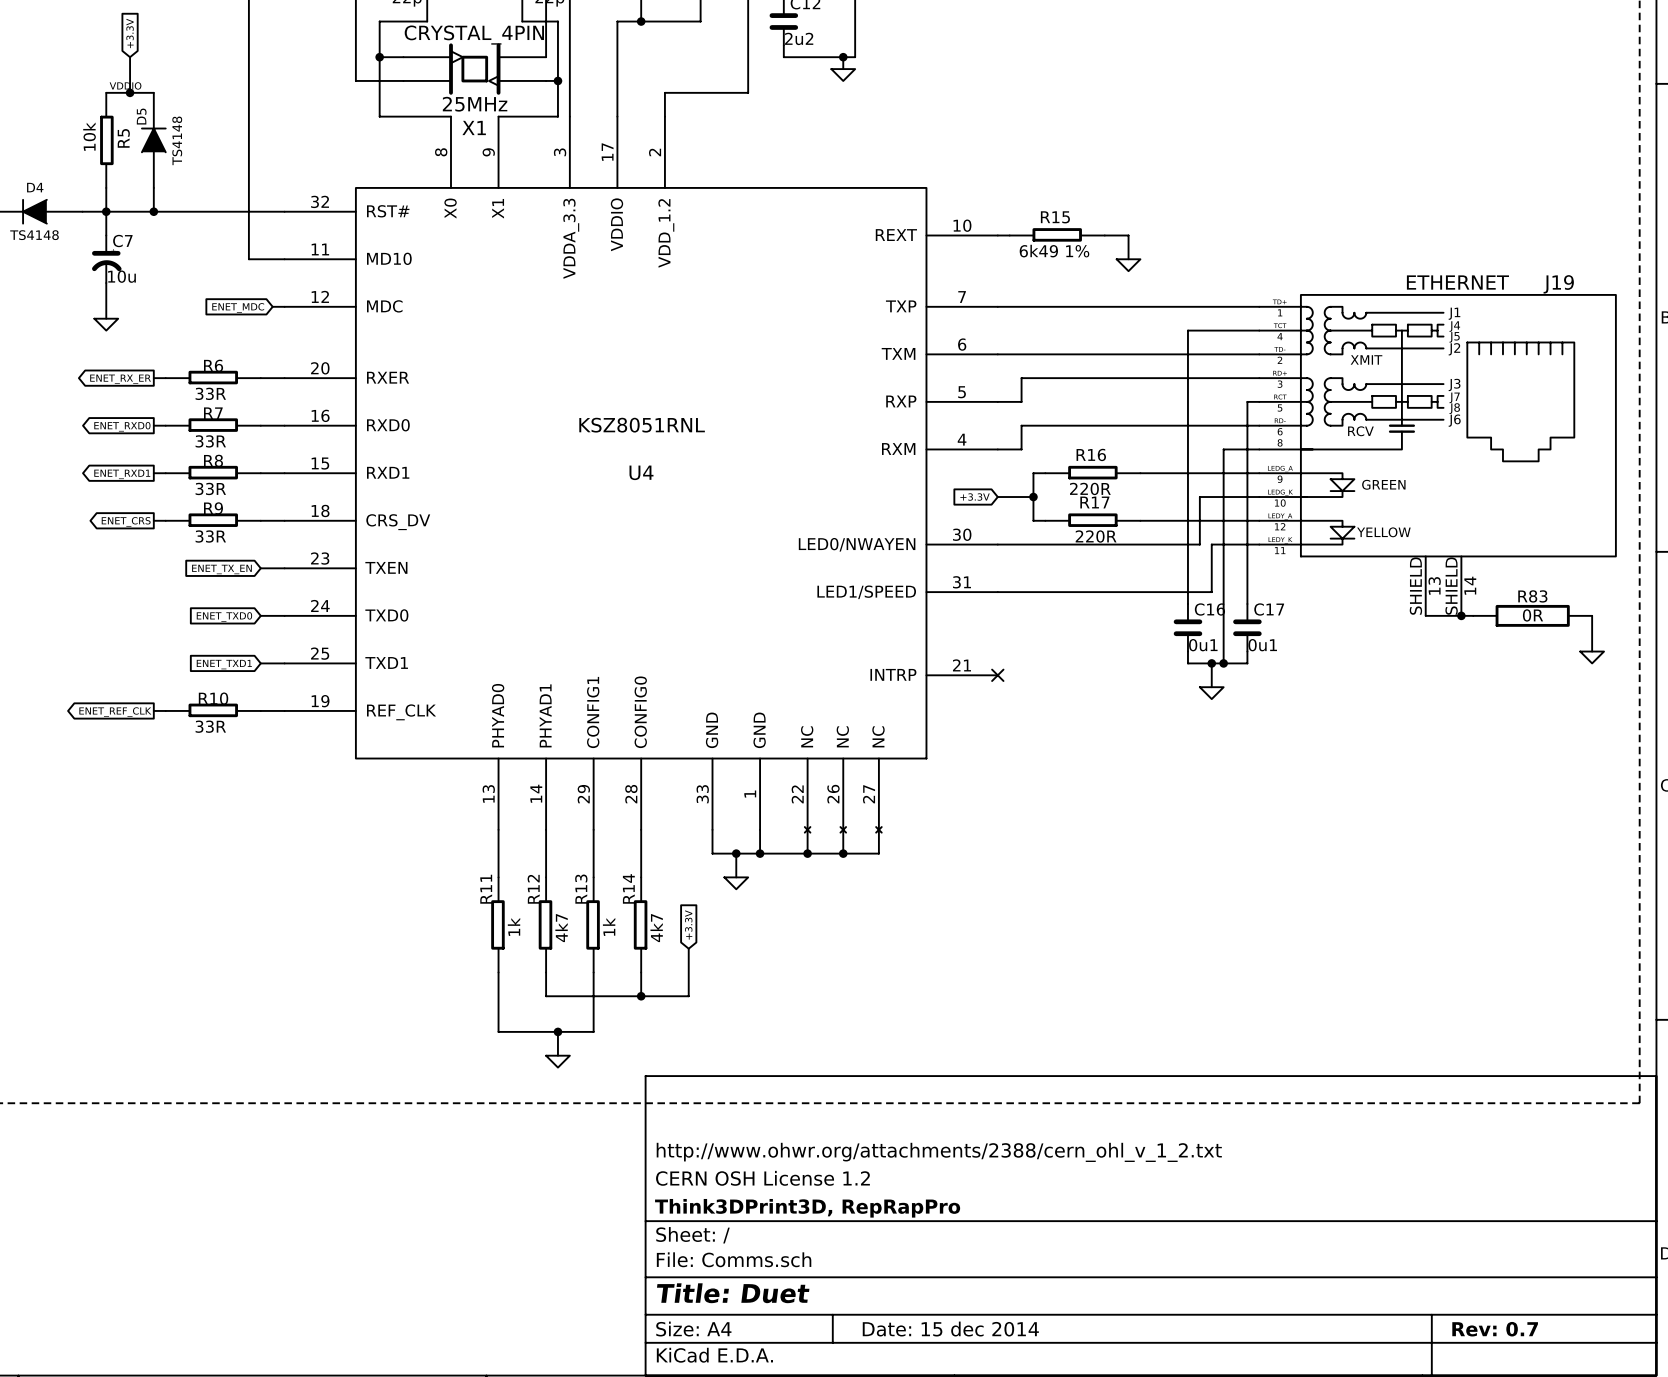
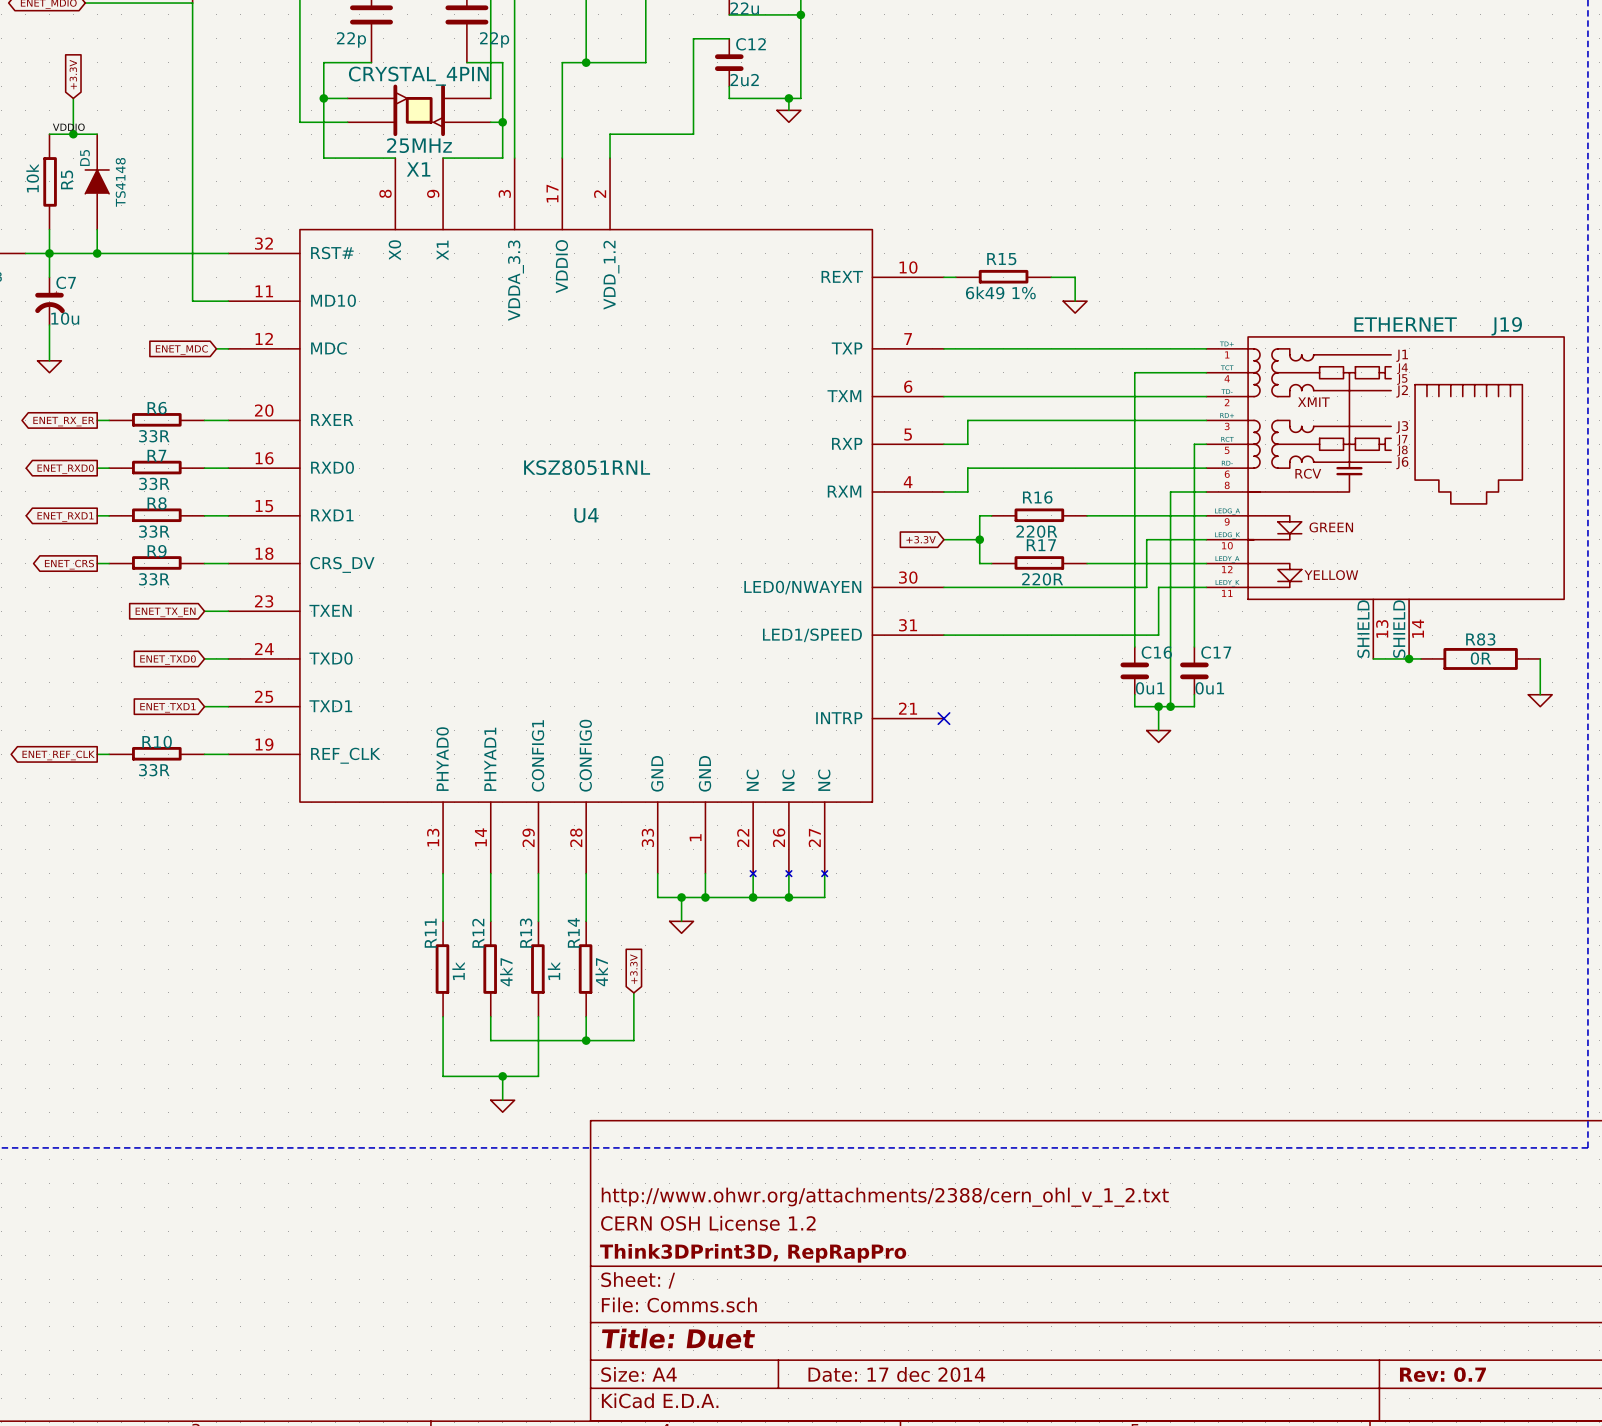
title block: Date: 15 dec 2014 (950, 1329) -> Date: 17 dec 2014 (896, 1374)

